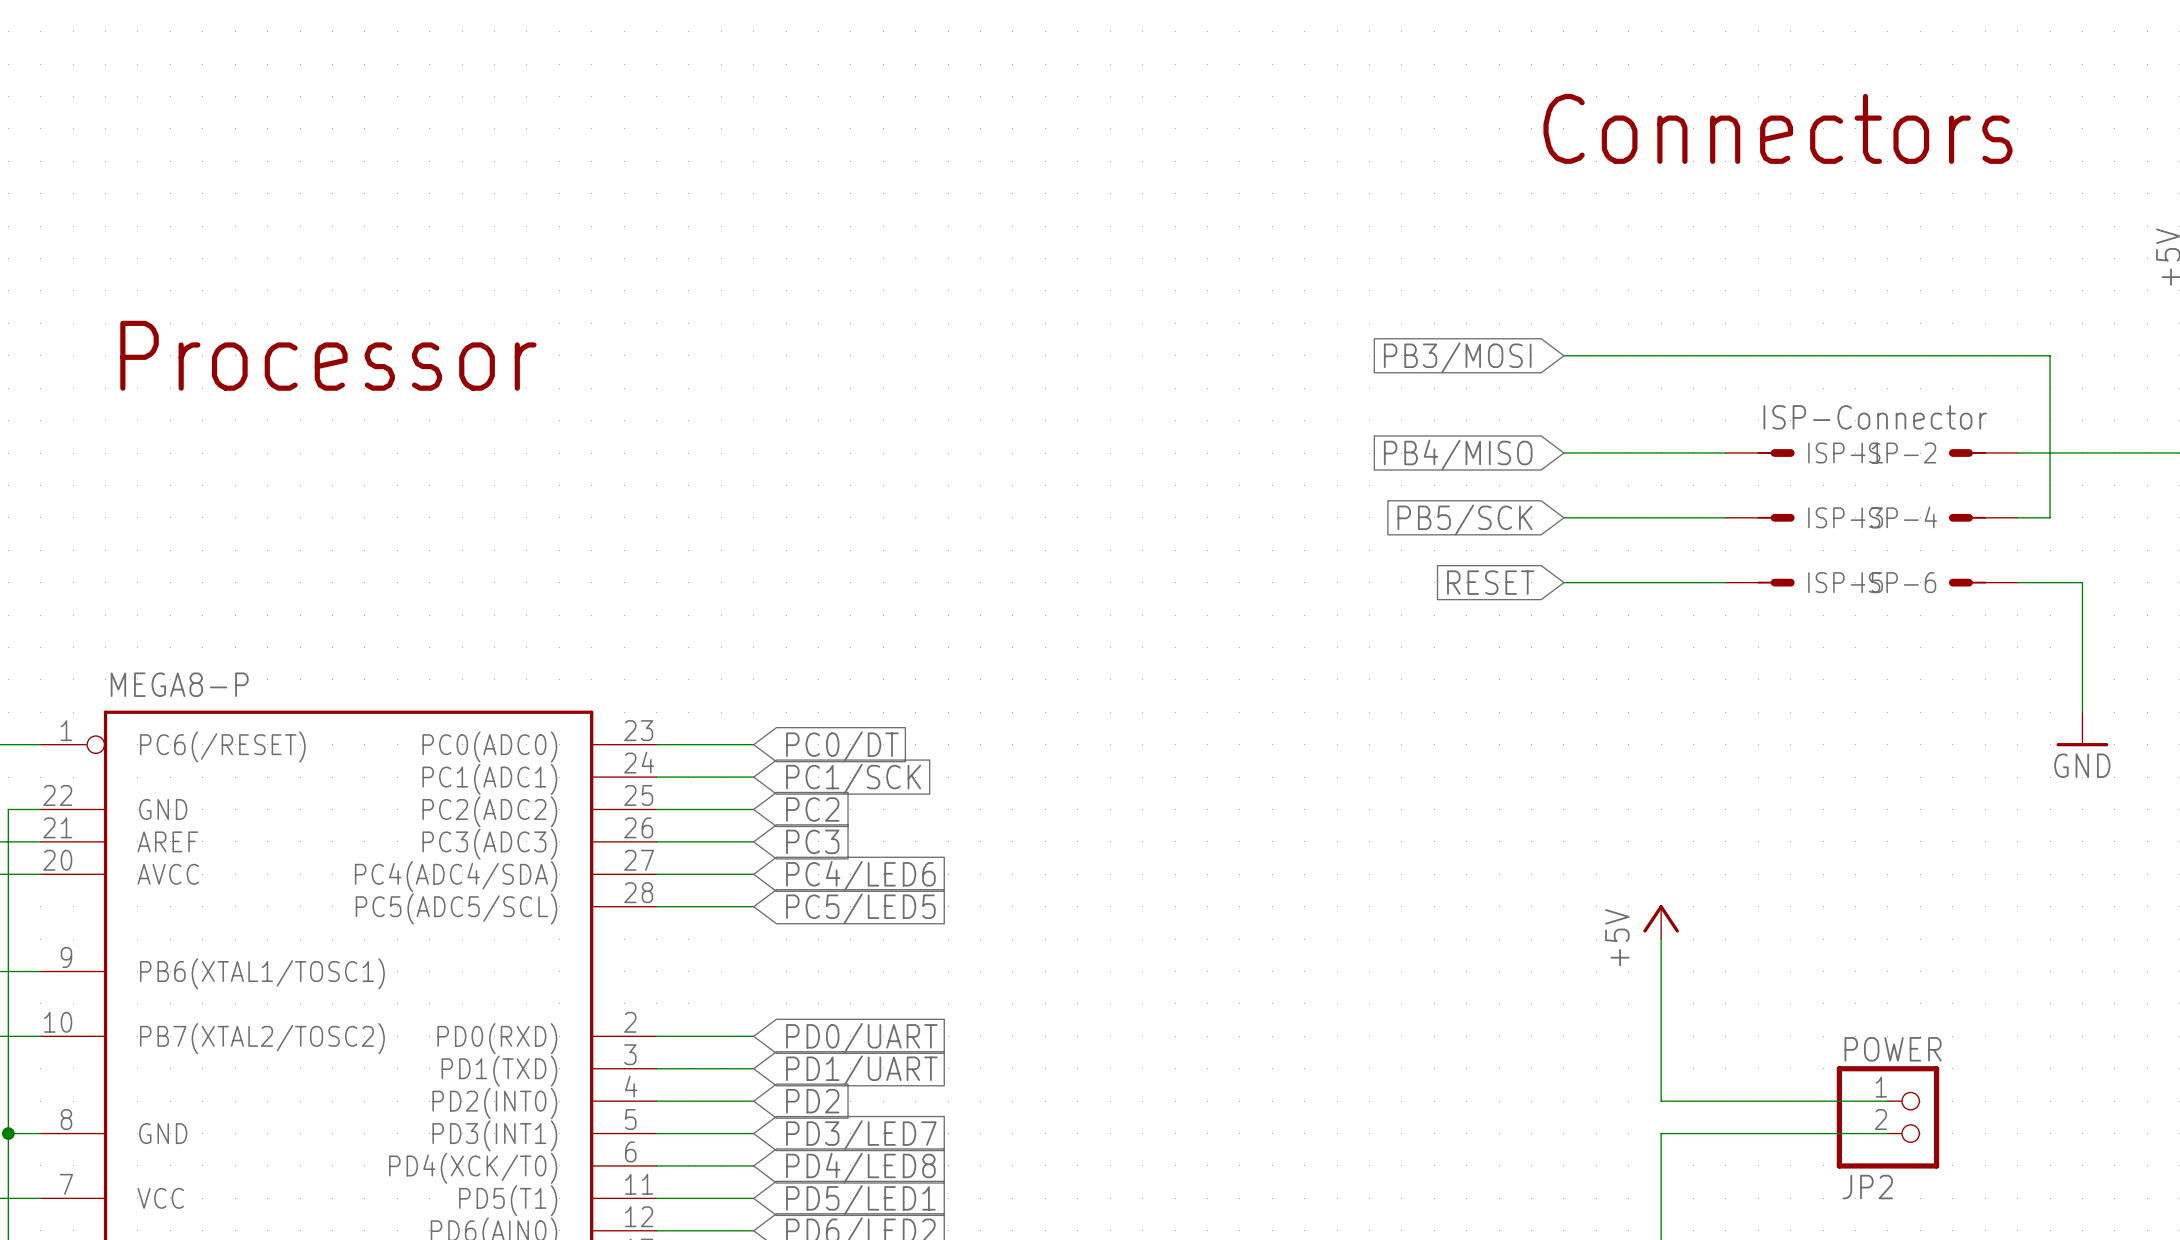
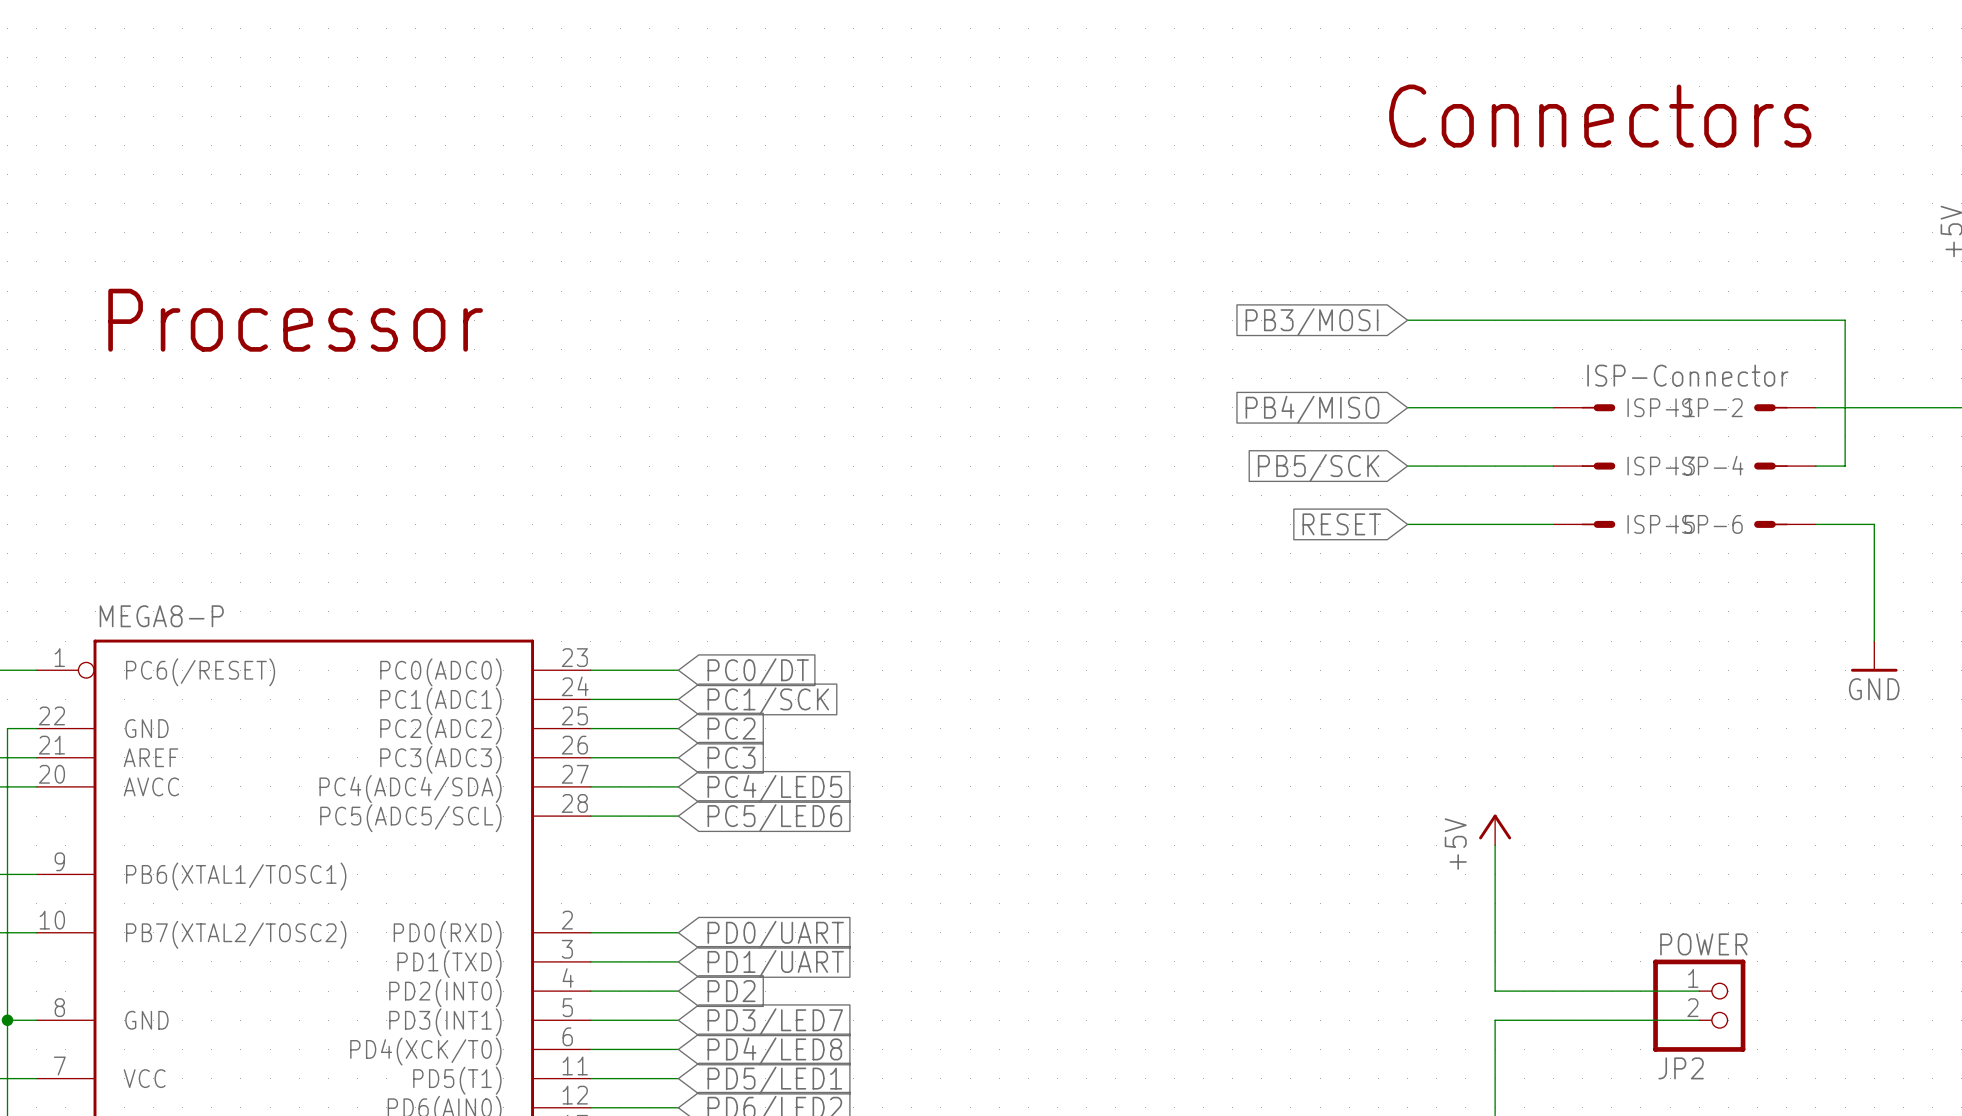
global label: PC4/LED6 (860, 876) -> PC4/LED5 (774, 788)
global label: PC5/LED5 (860, 908) -> PC5/LED6 (774, 818)

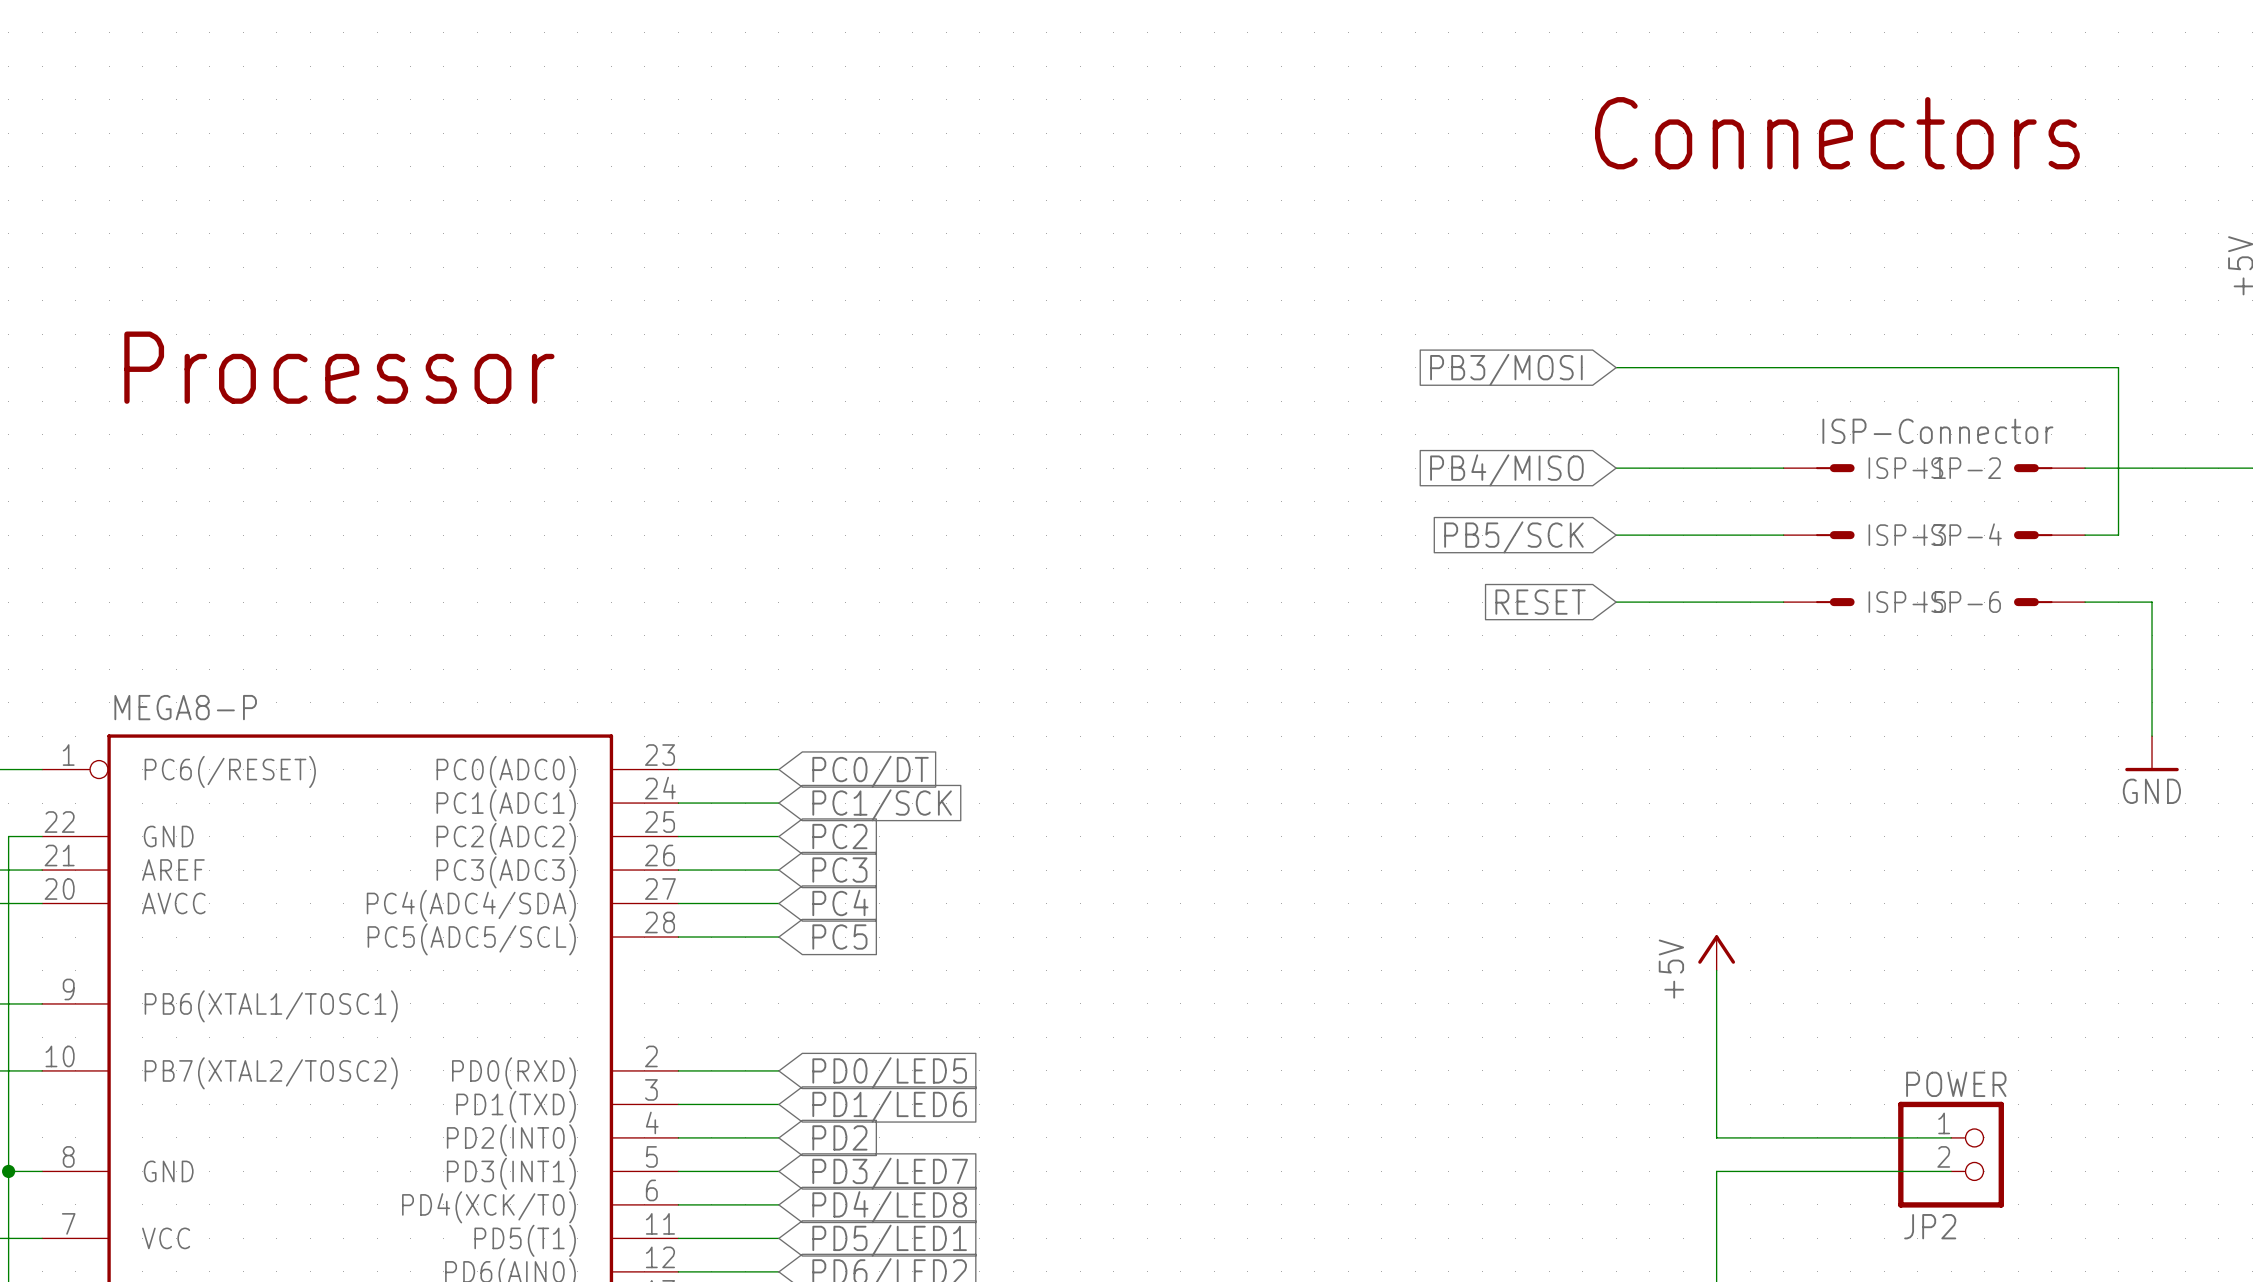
global label: PC4/LED5 (774, 788) -> PC4 (840, 902)
global label: PC5/LED6 (774, 818) -> PC5 (839, 937)
global label: PD0/UART (775, 934) -> PD0/LED5 (889, 1073)
global label: PD1/UART (775, 963) -> PD1/LED6 (889, 1106)

